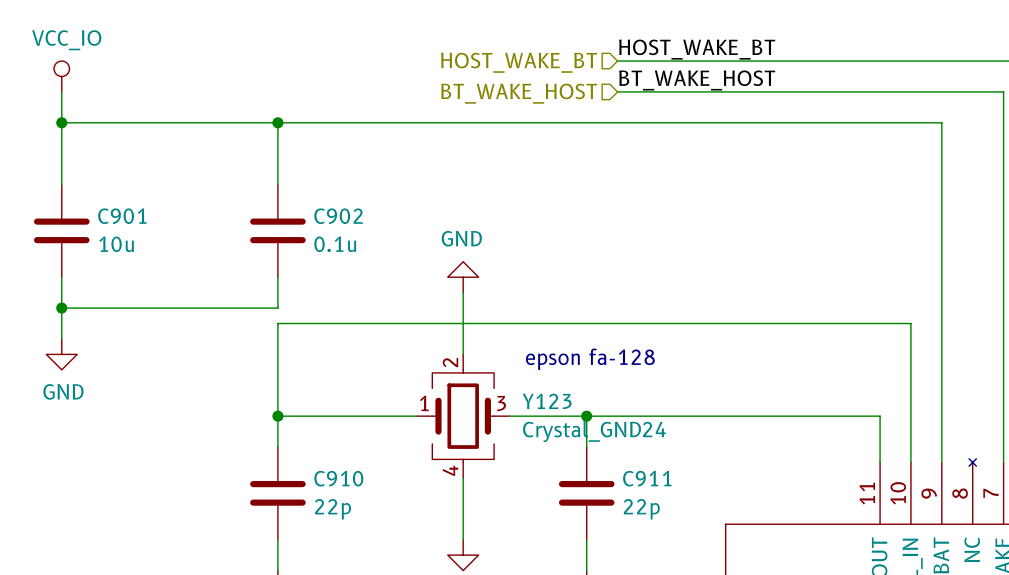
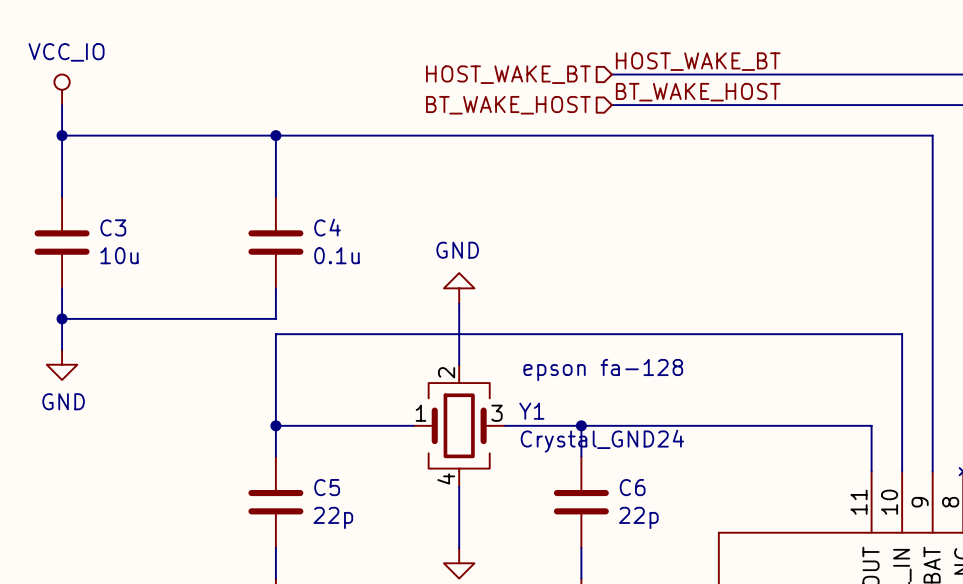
C901 name: C901 (122, 216) -> C3 (113, 227)
C902 name: C902 (338, 216) -> C4 (327, 227)
Y123 name: Y123 (547, 401) -> Y1 (531, 411)
C910 name: C910 (338, 478) -> C5 (327, 487)
C911 name: C911 (647, 478) -> C6 (632, 487)

